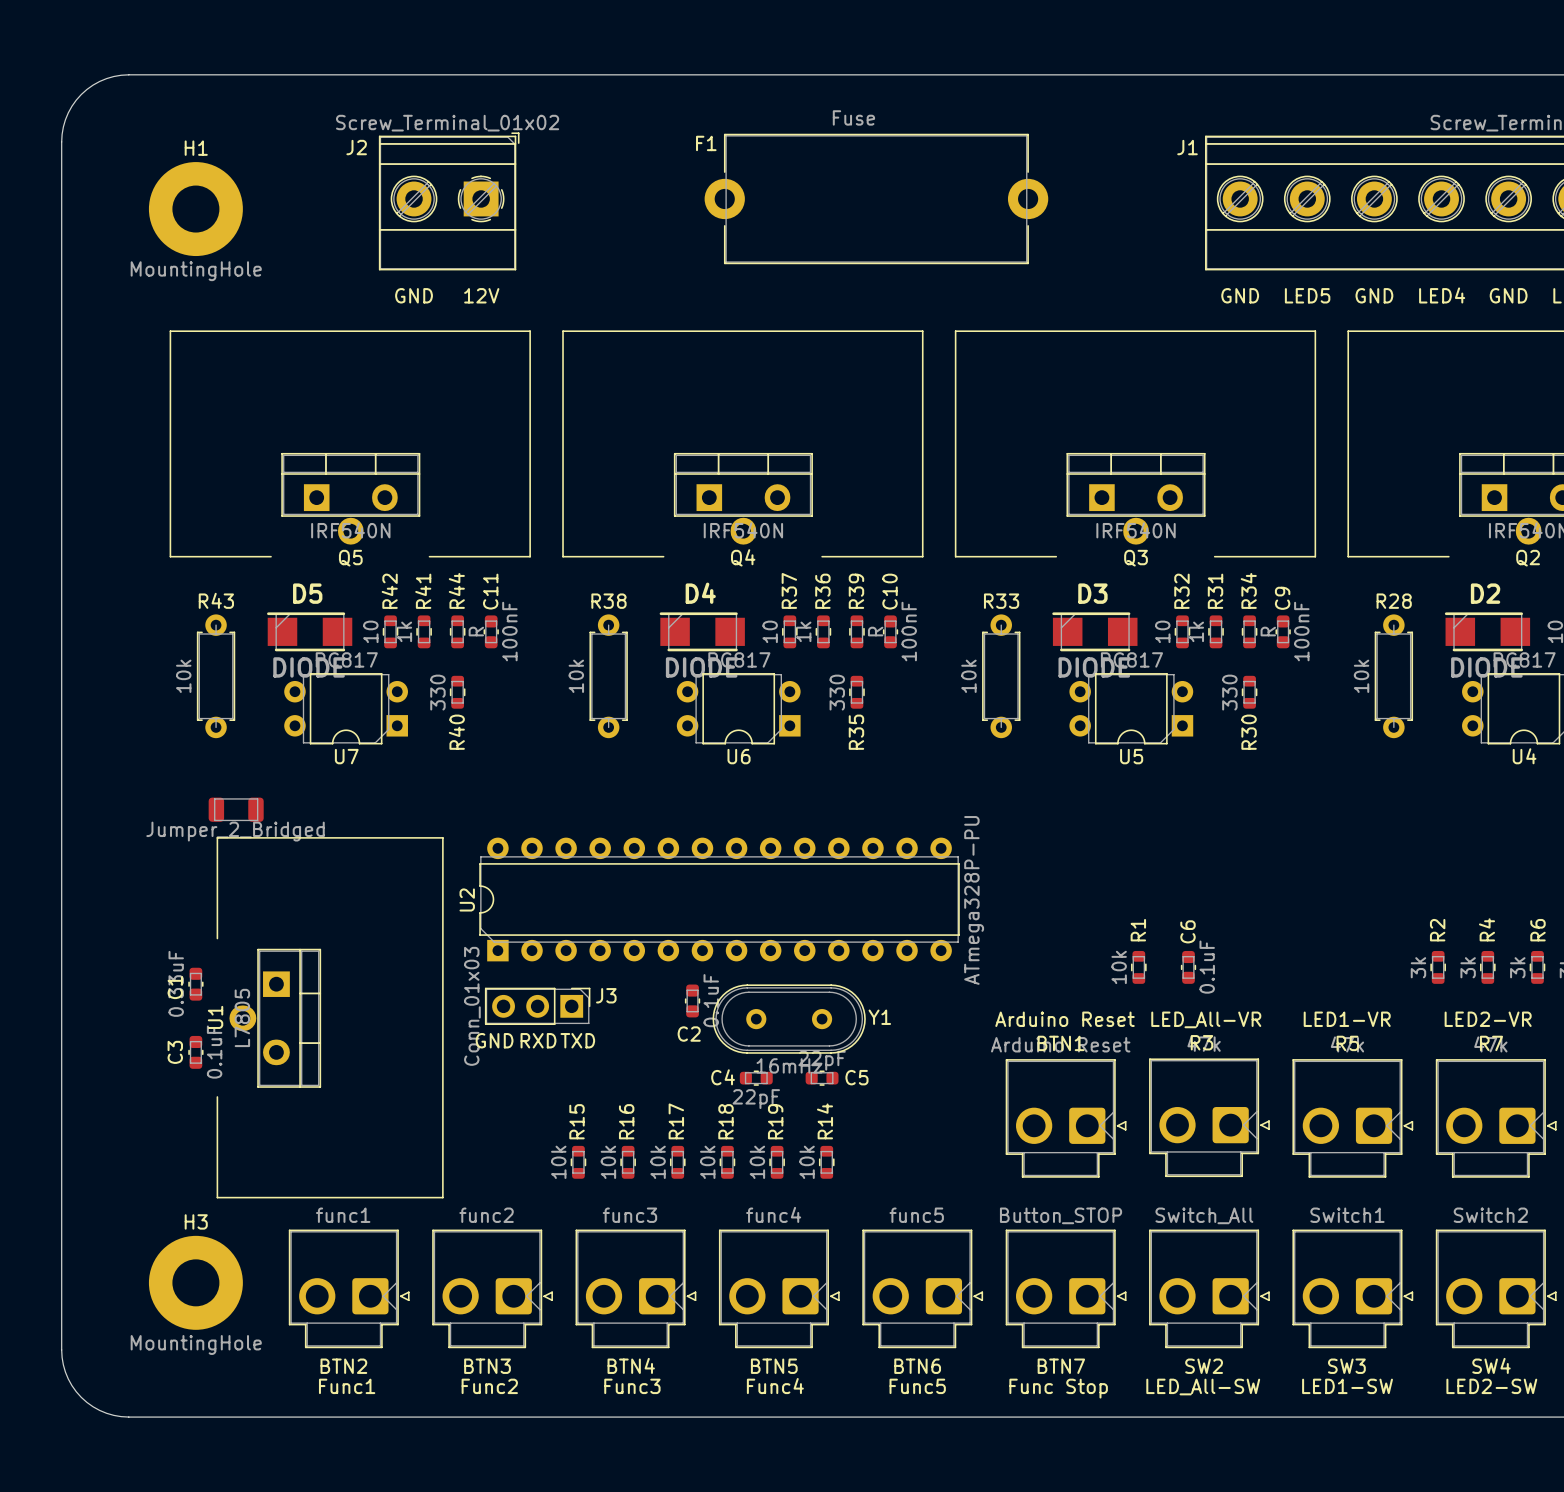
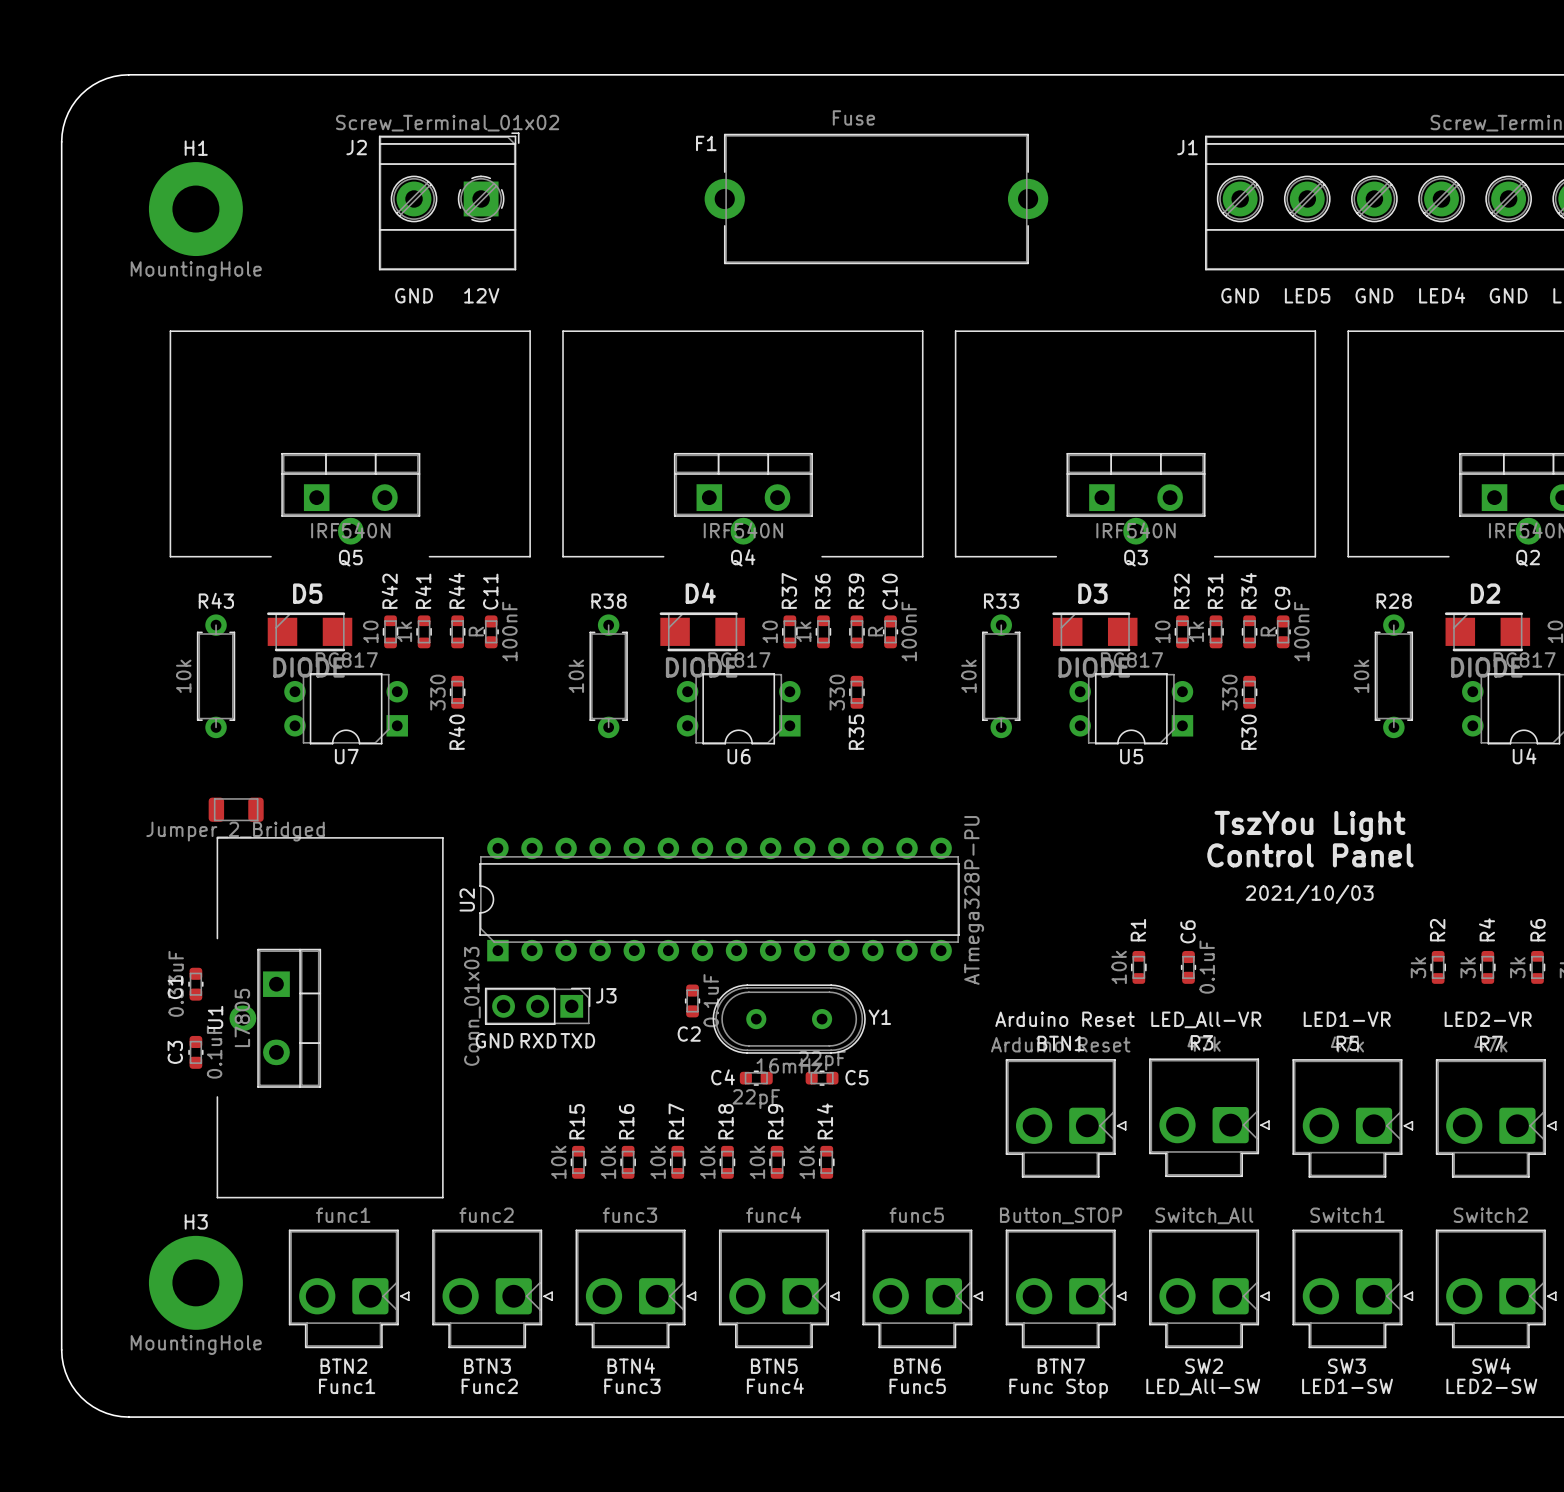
text: none -> TszYou Light (1309, 826)
text: none -> Control Panel (1310, 855)
text: none -> 2021/10/03 (1309, 894)

